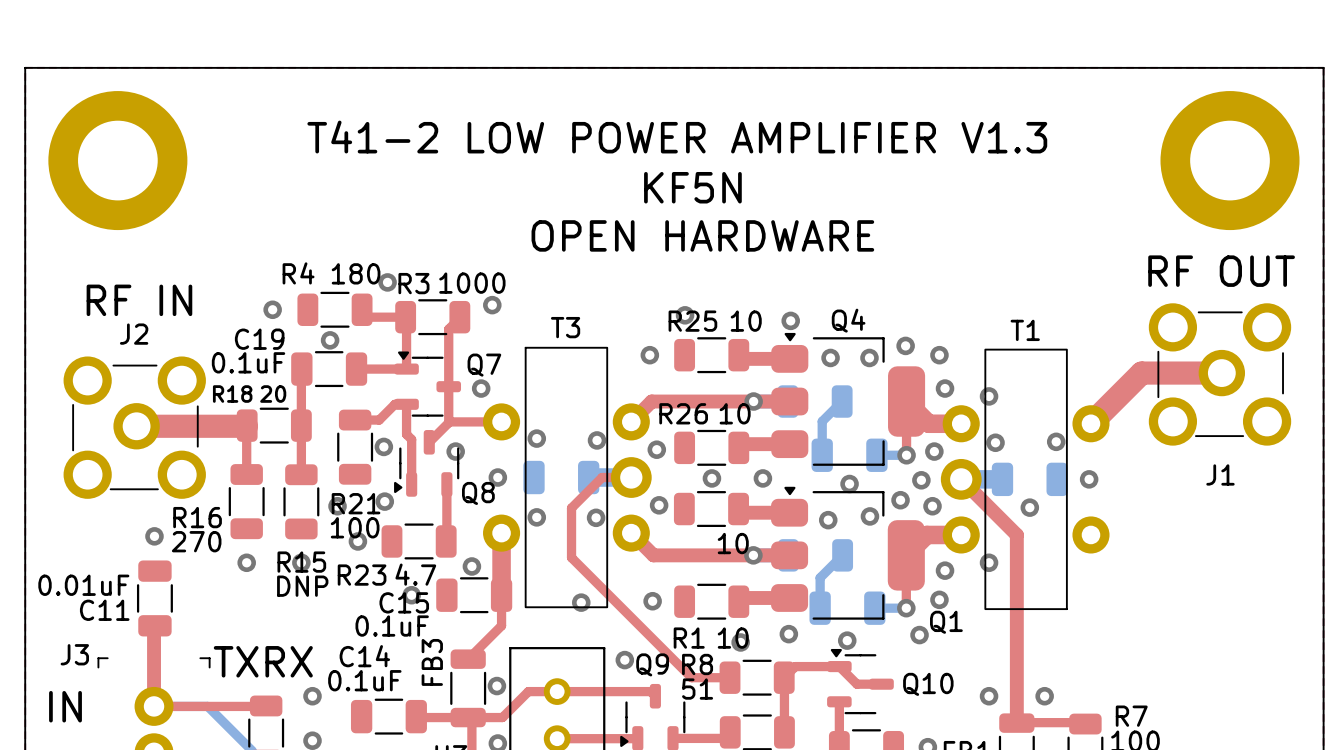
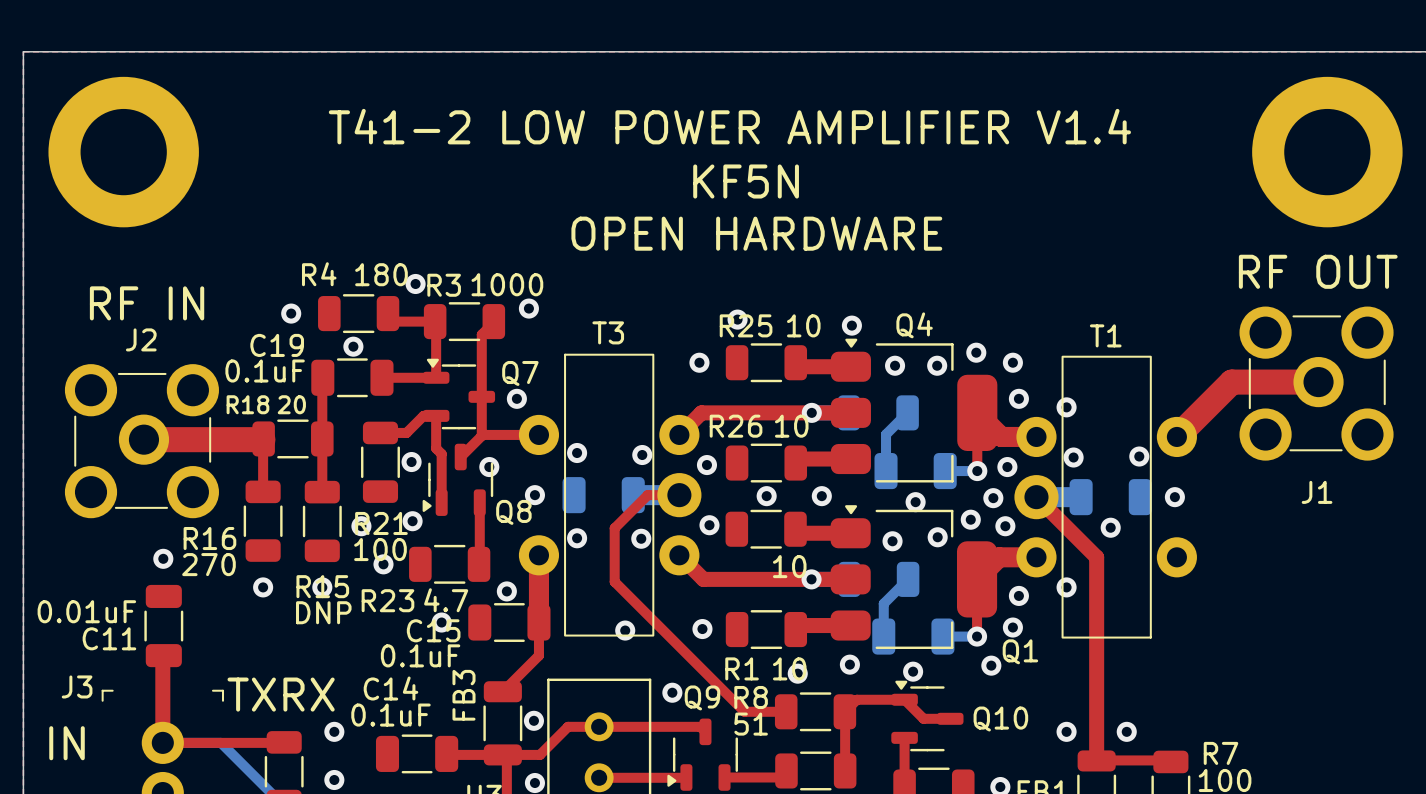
text: T41-2 LOW POWER AMPLIFIER V1.3 (677, 137) -> T41-2 LOW POWER AMPLIFIER V1.4 (729, 126)

